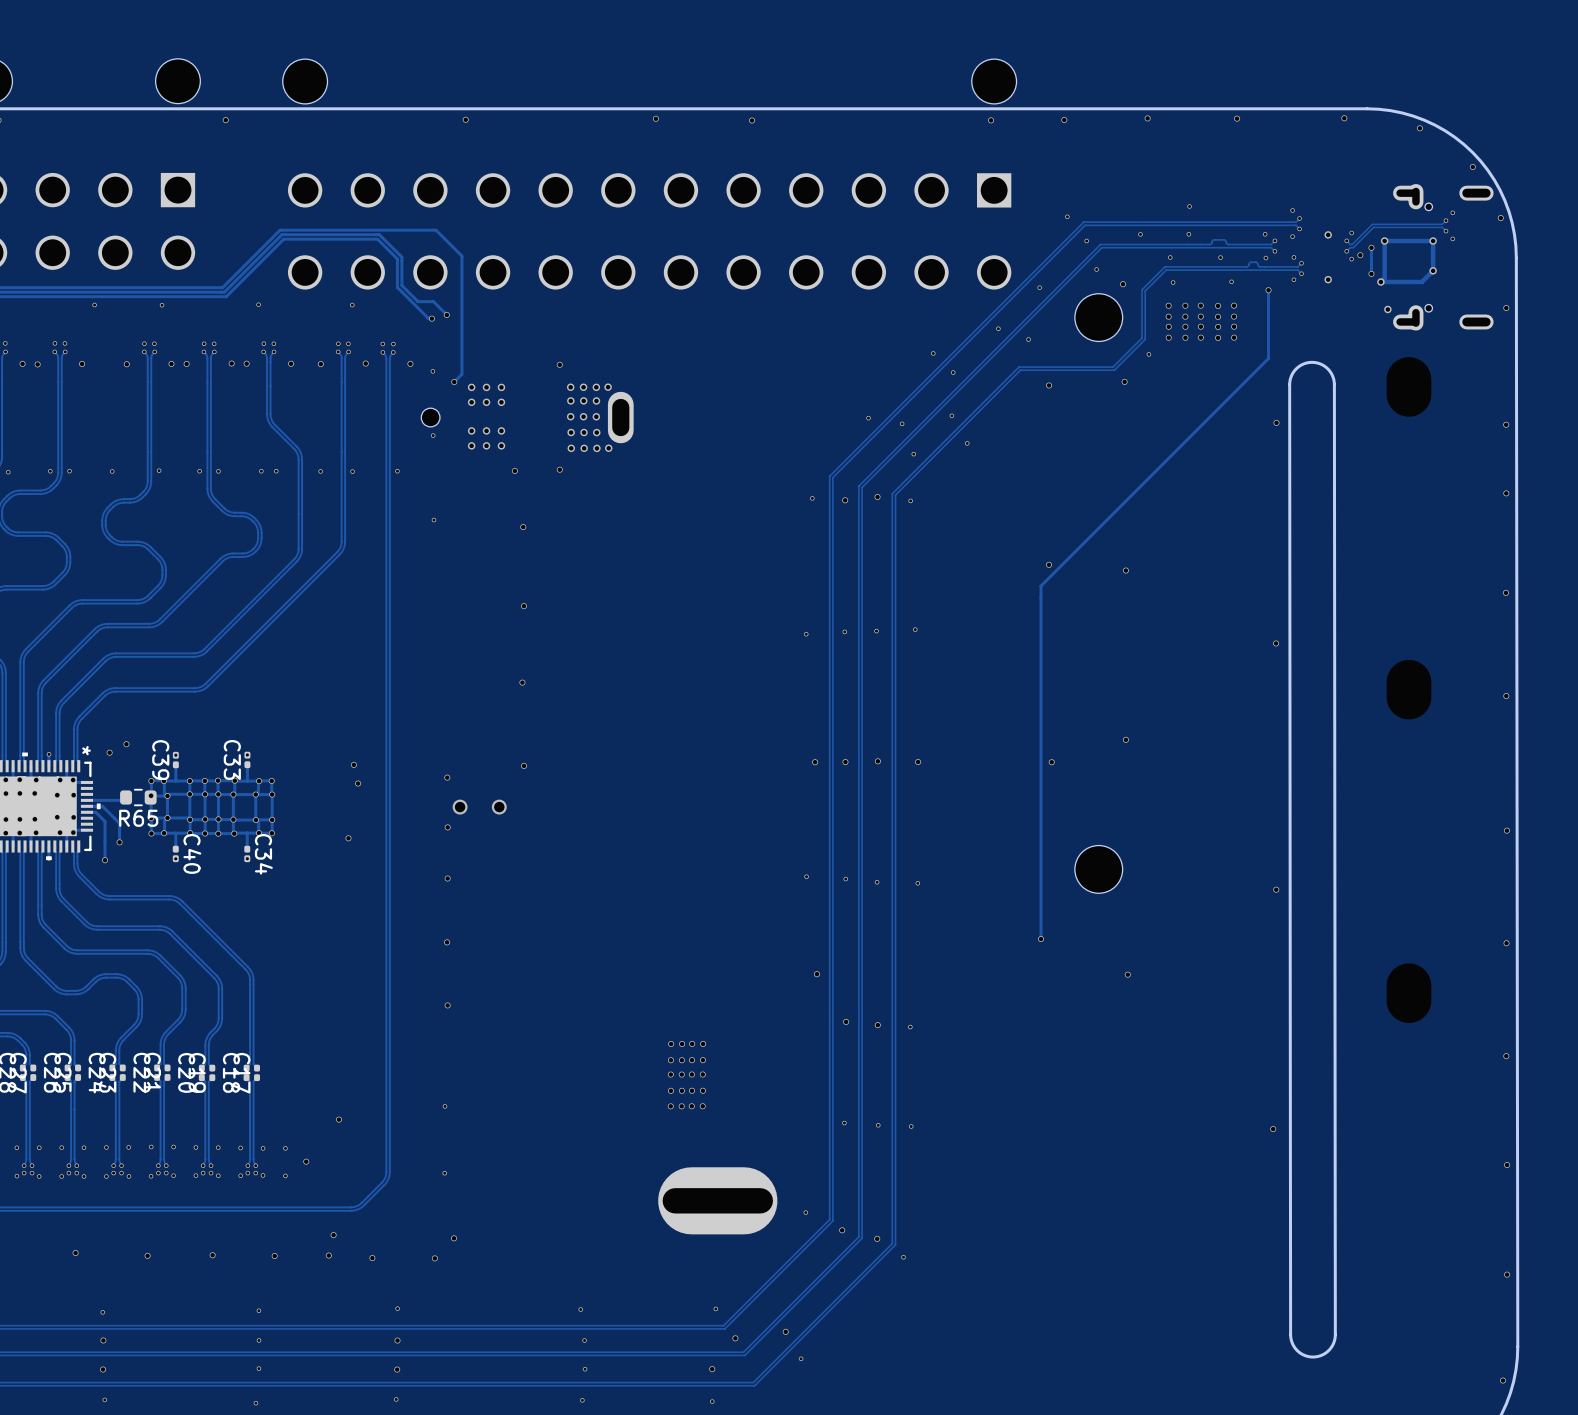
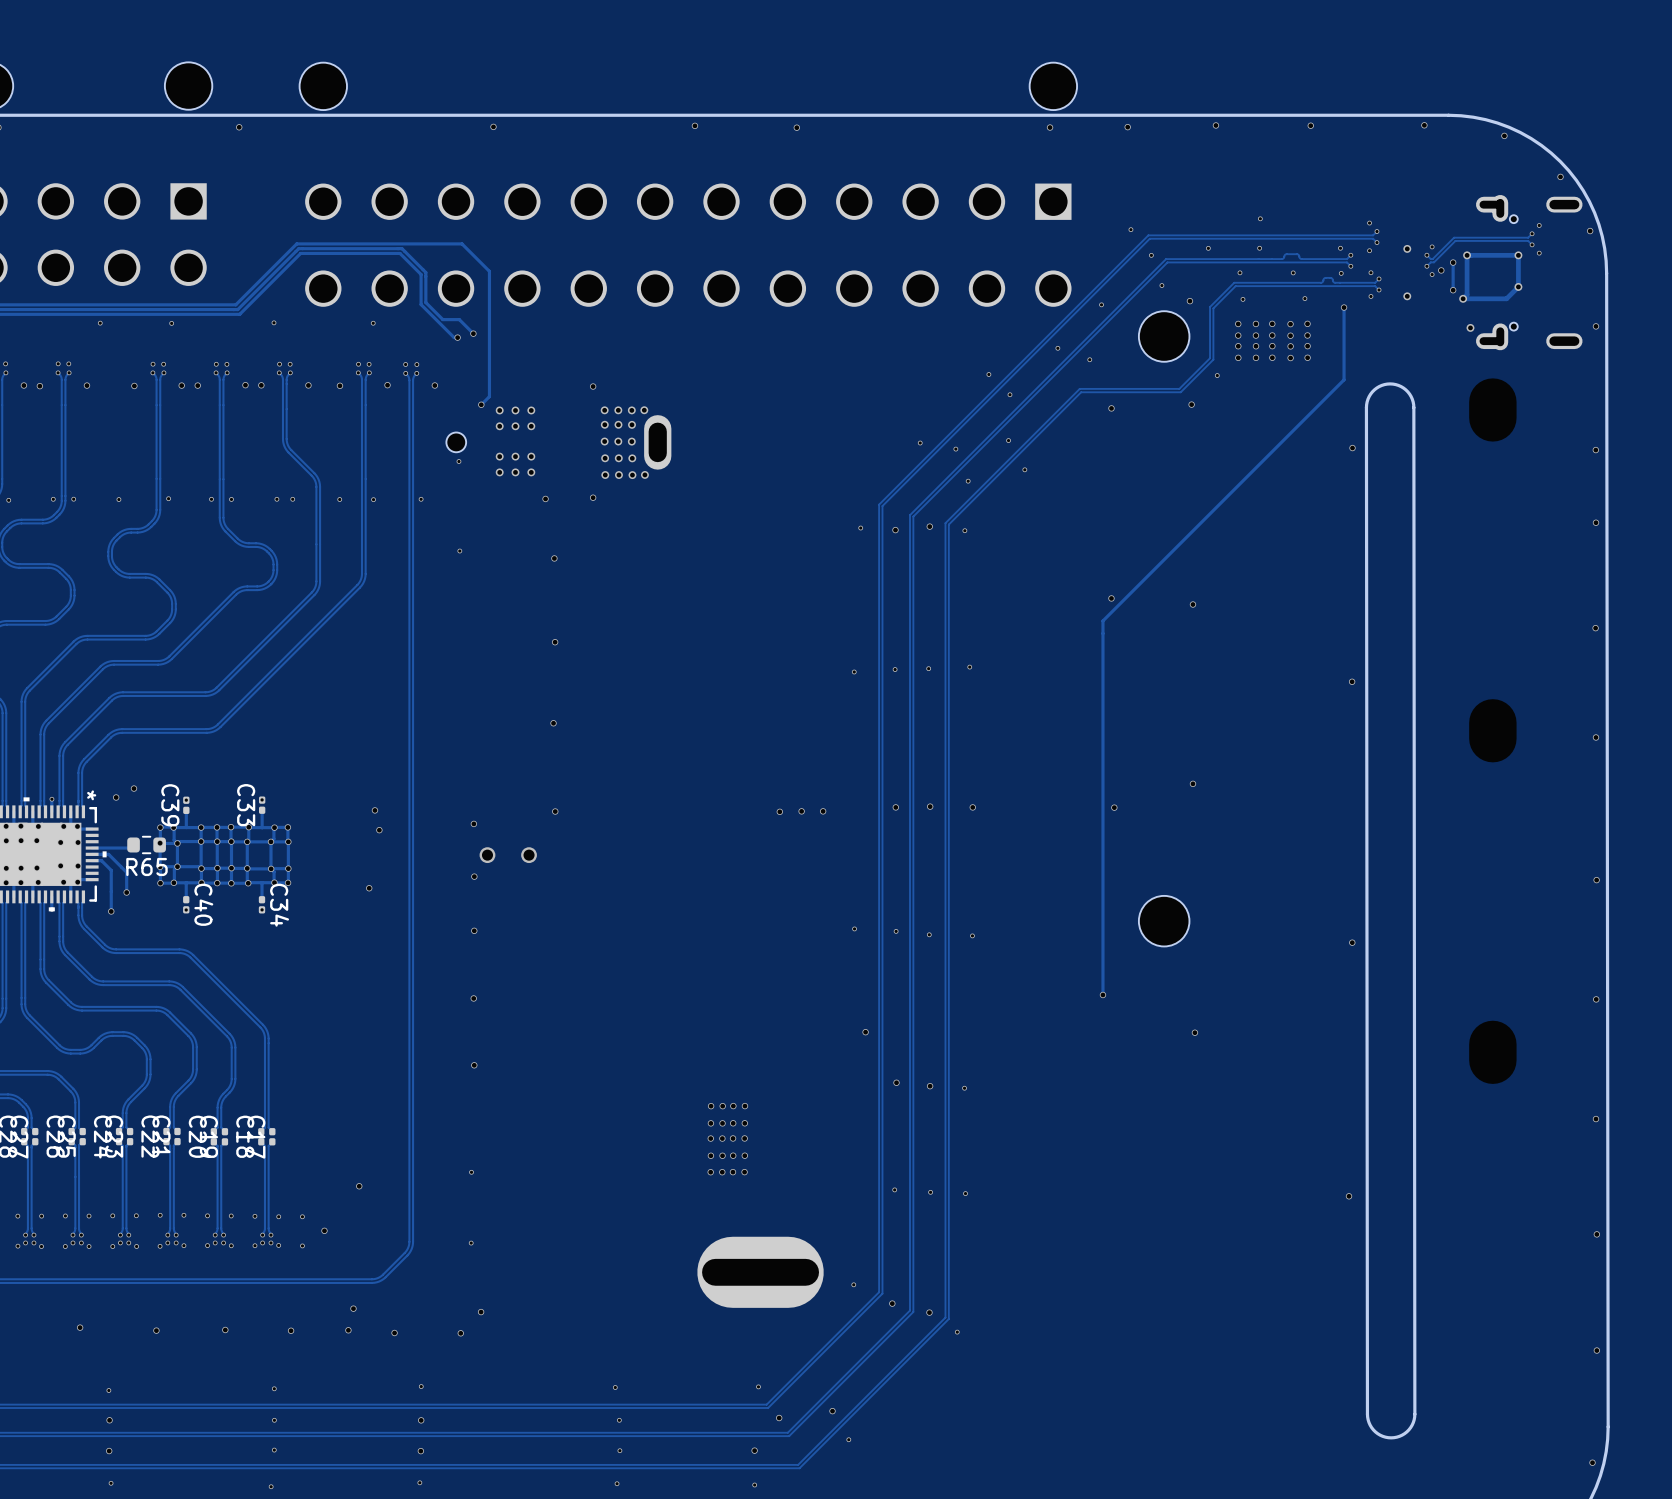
via: (432, 371) -> none
via: (815, 762) -> none
via: none -> (801, 811)
via: none -> (823, 811)
via: none -> (779, 811)

